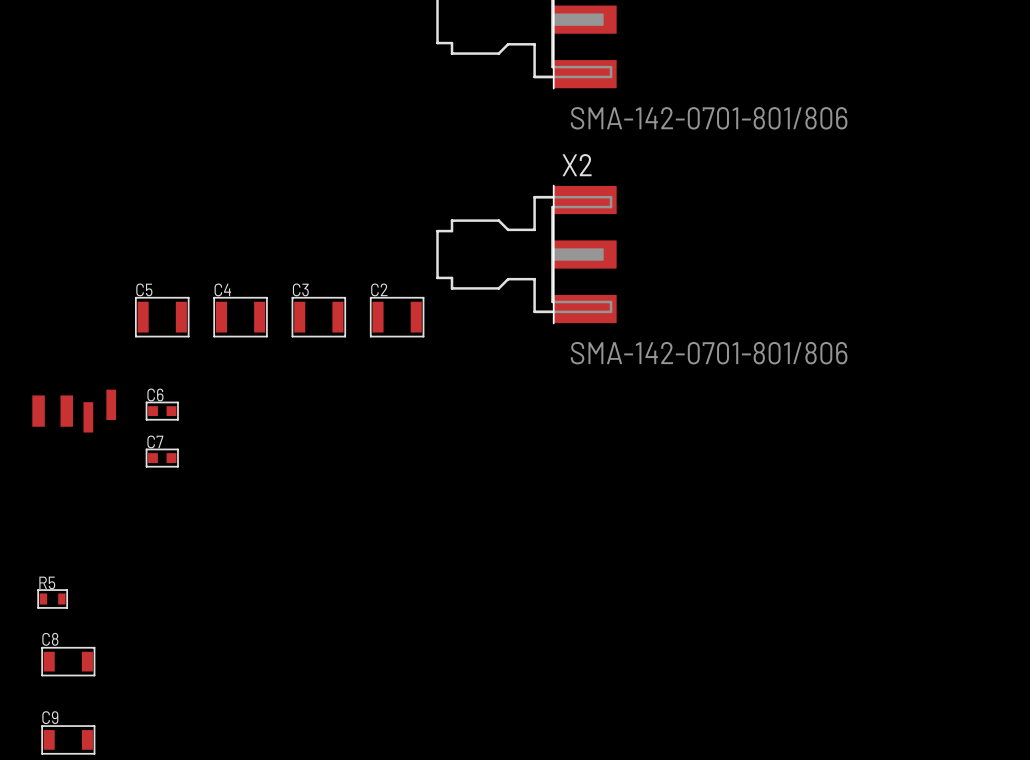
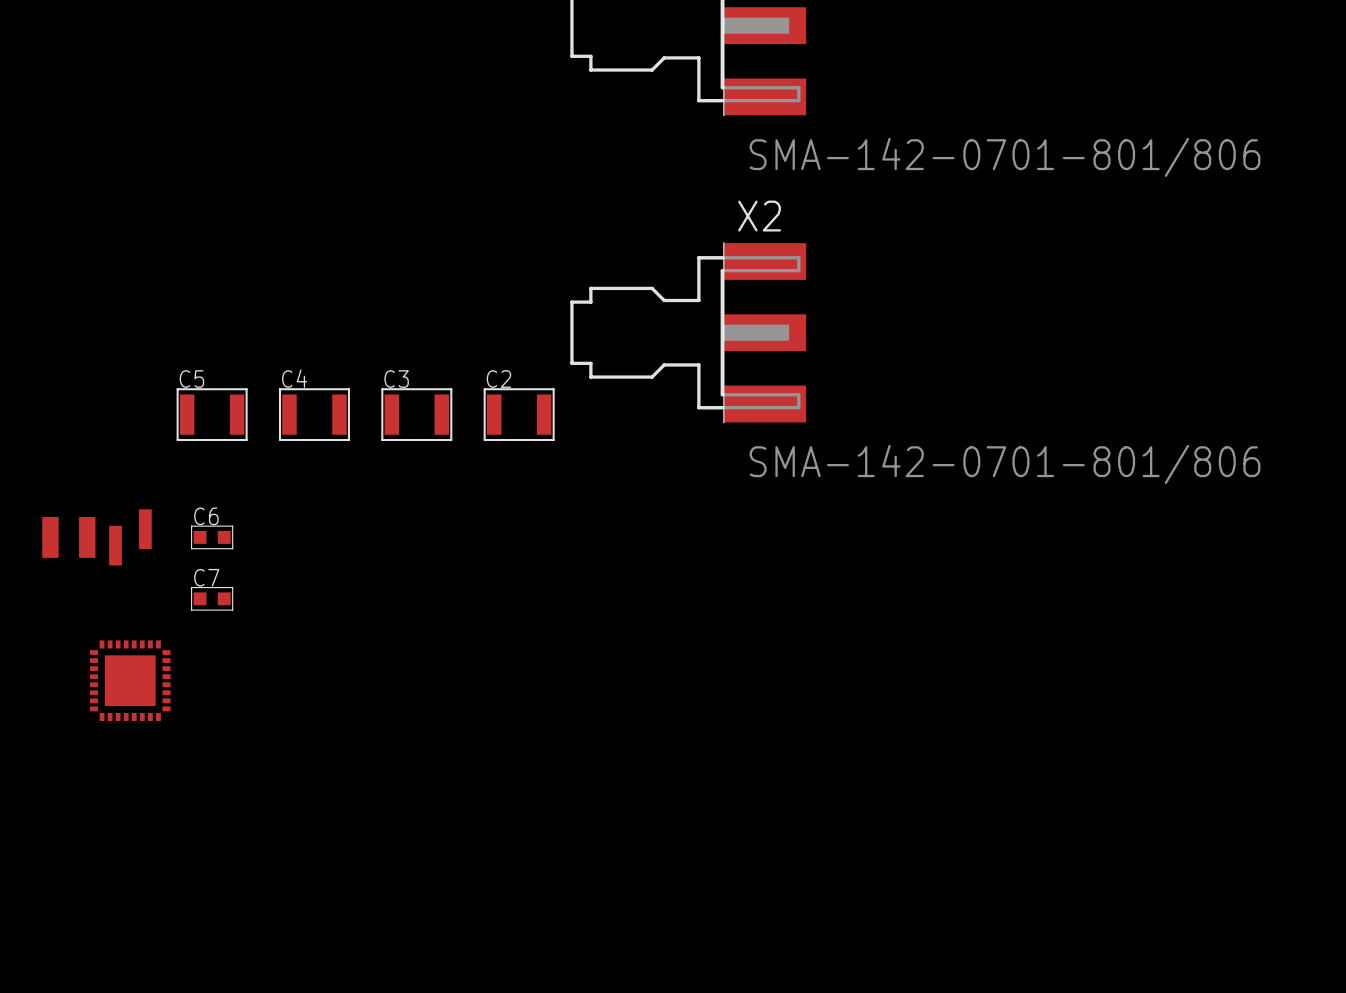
part: none -> (130, 680)
R5: (52, 598) -> none
C8: (68, 661) -> none
C9: (68, 739) -> none

